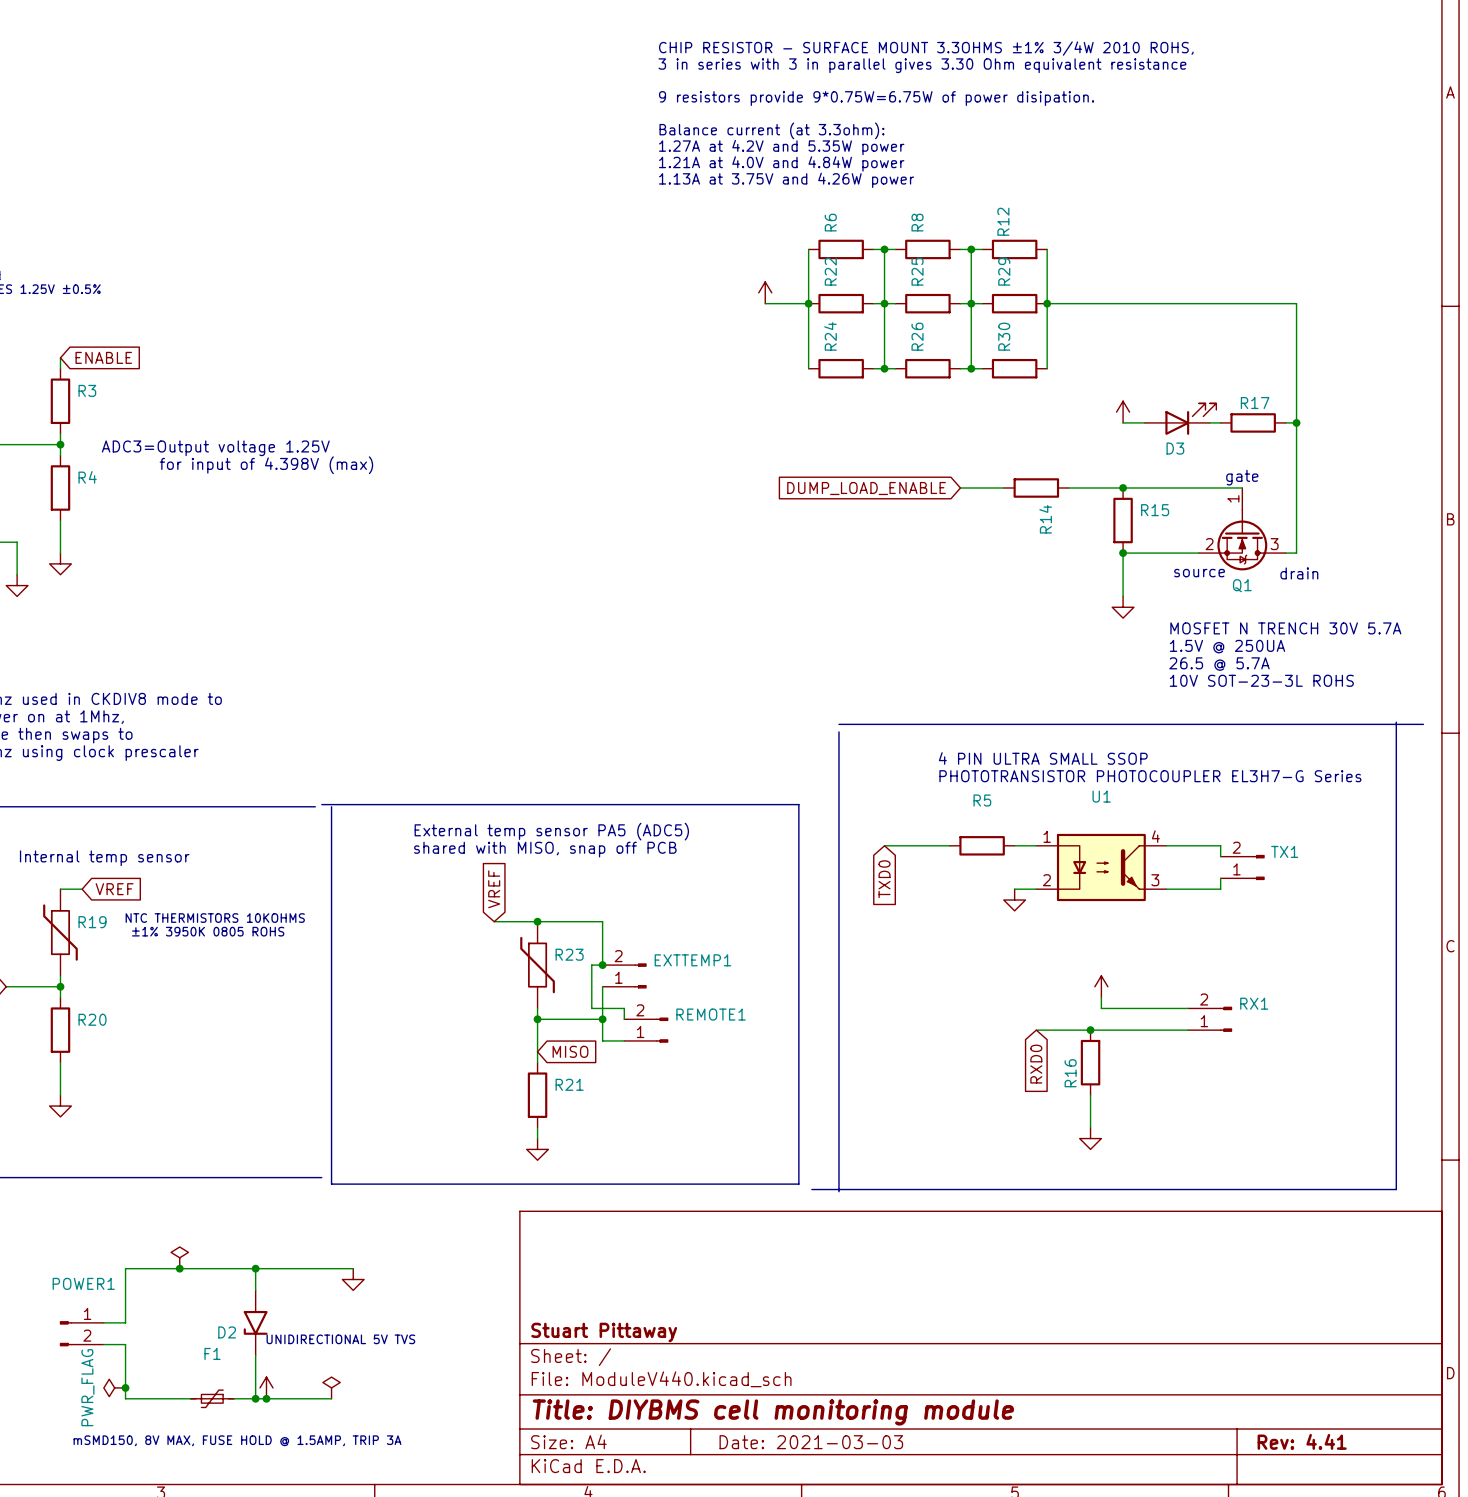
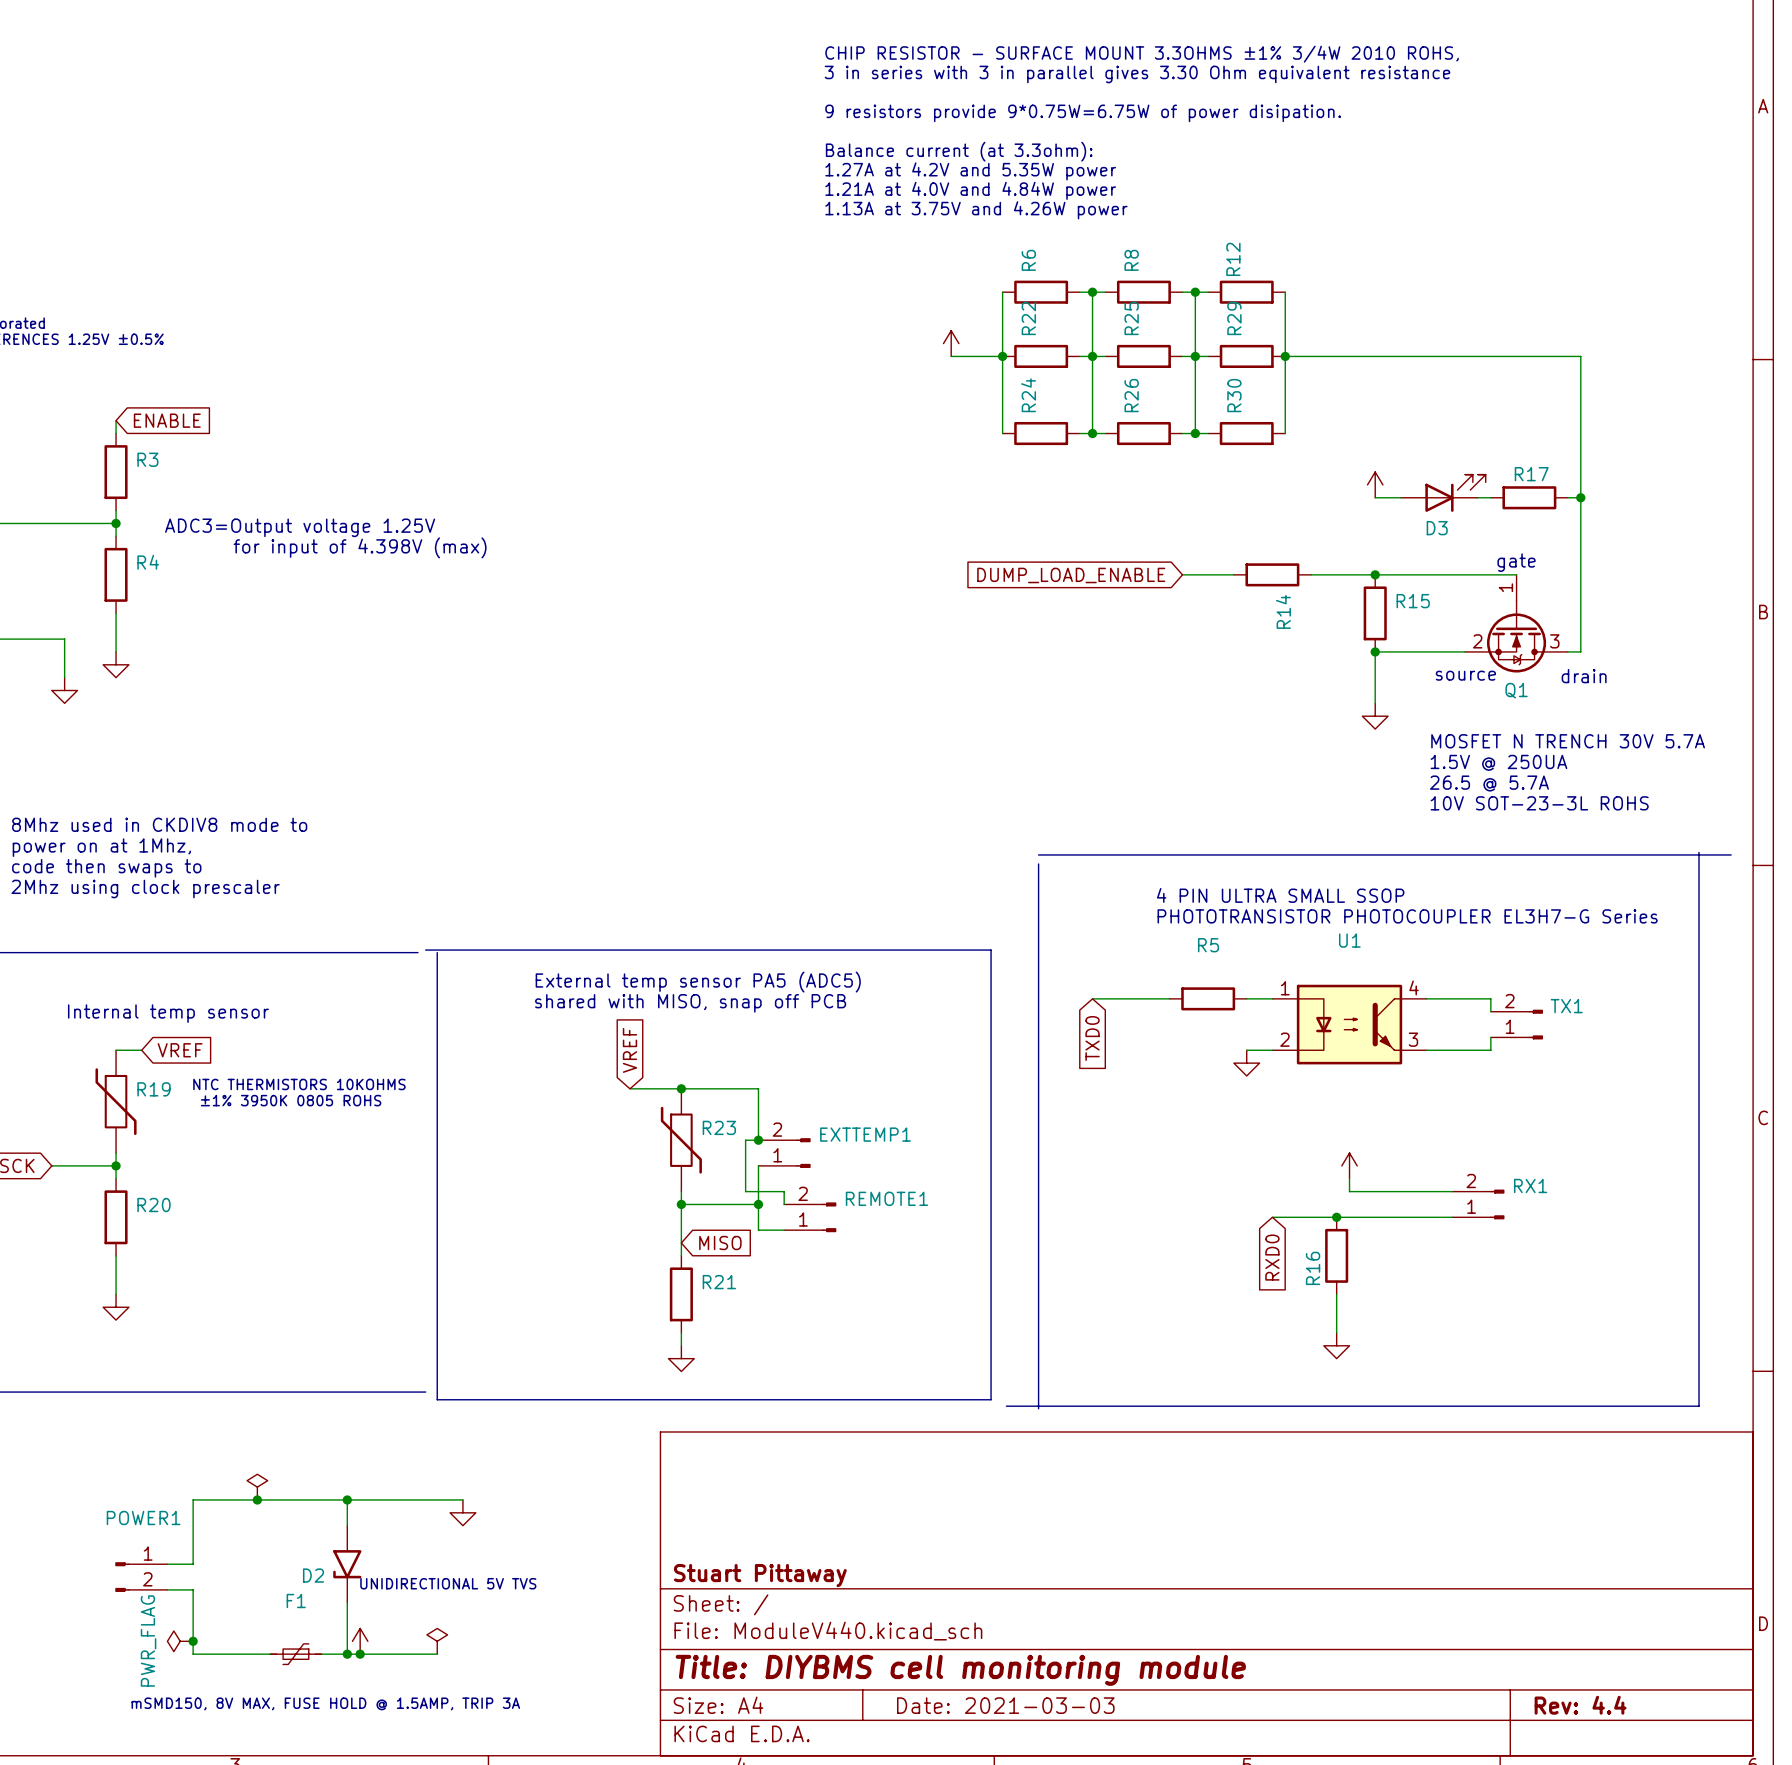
title block: Rev: 4.41 (1302, 1441) -> Rev: 4.4 (1580, 1705)

